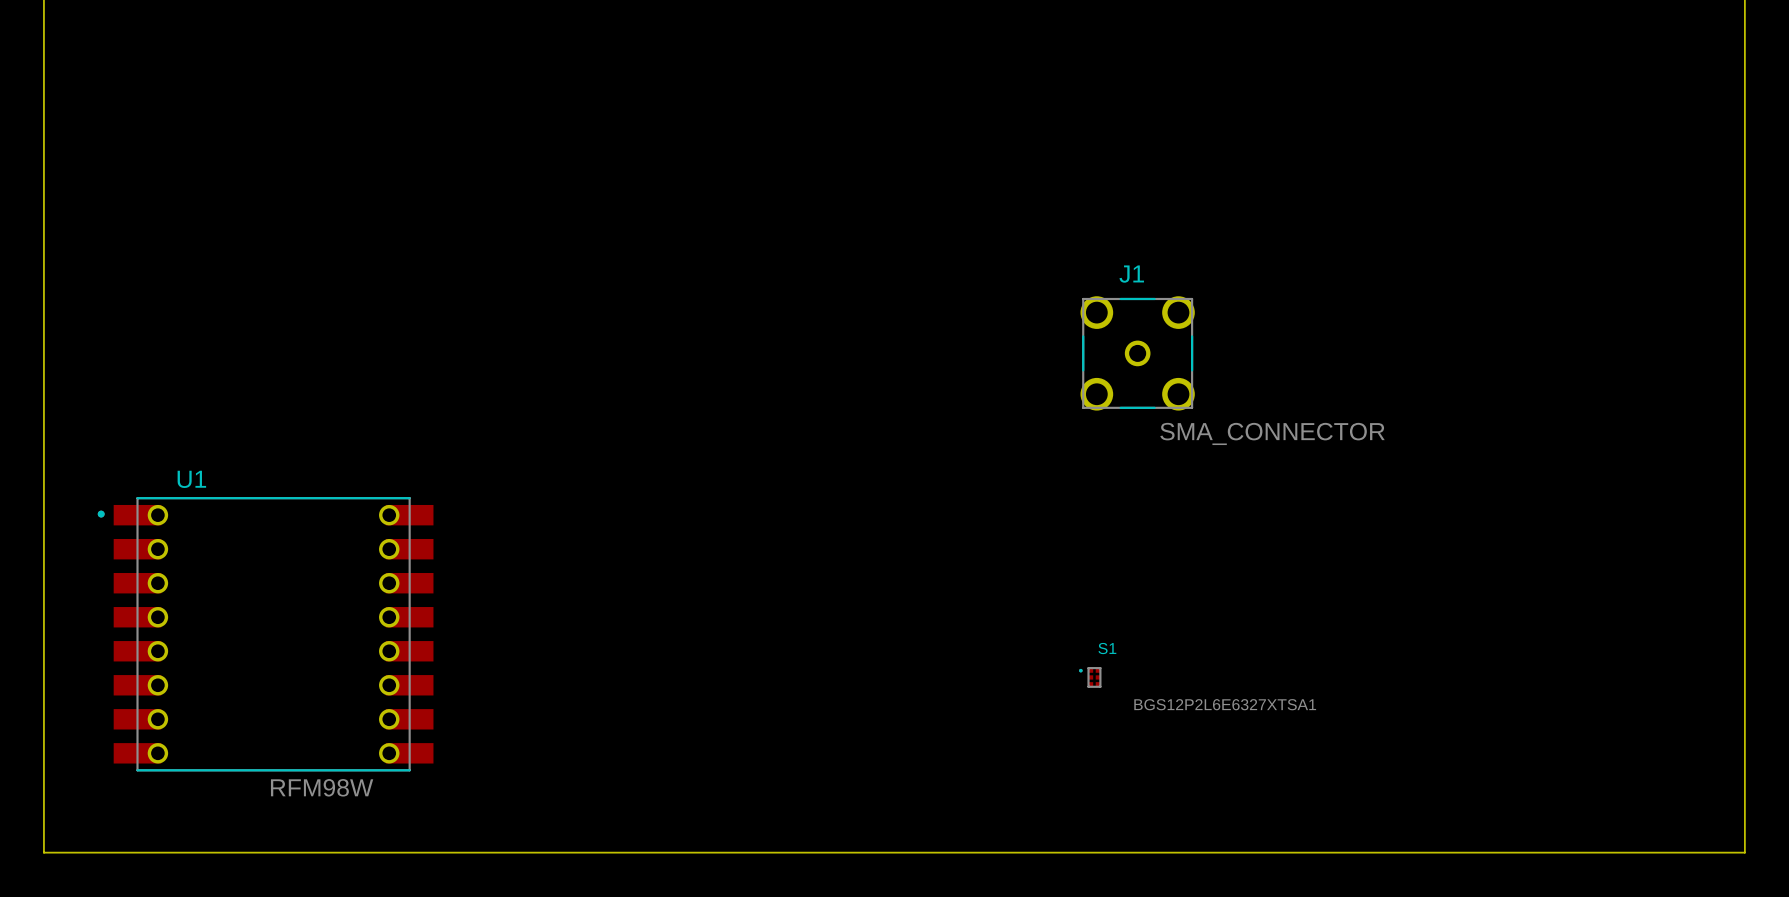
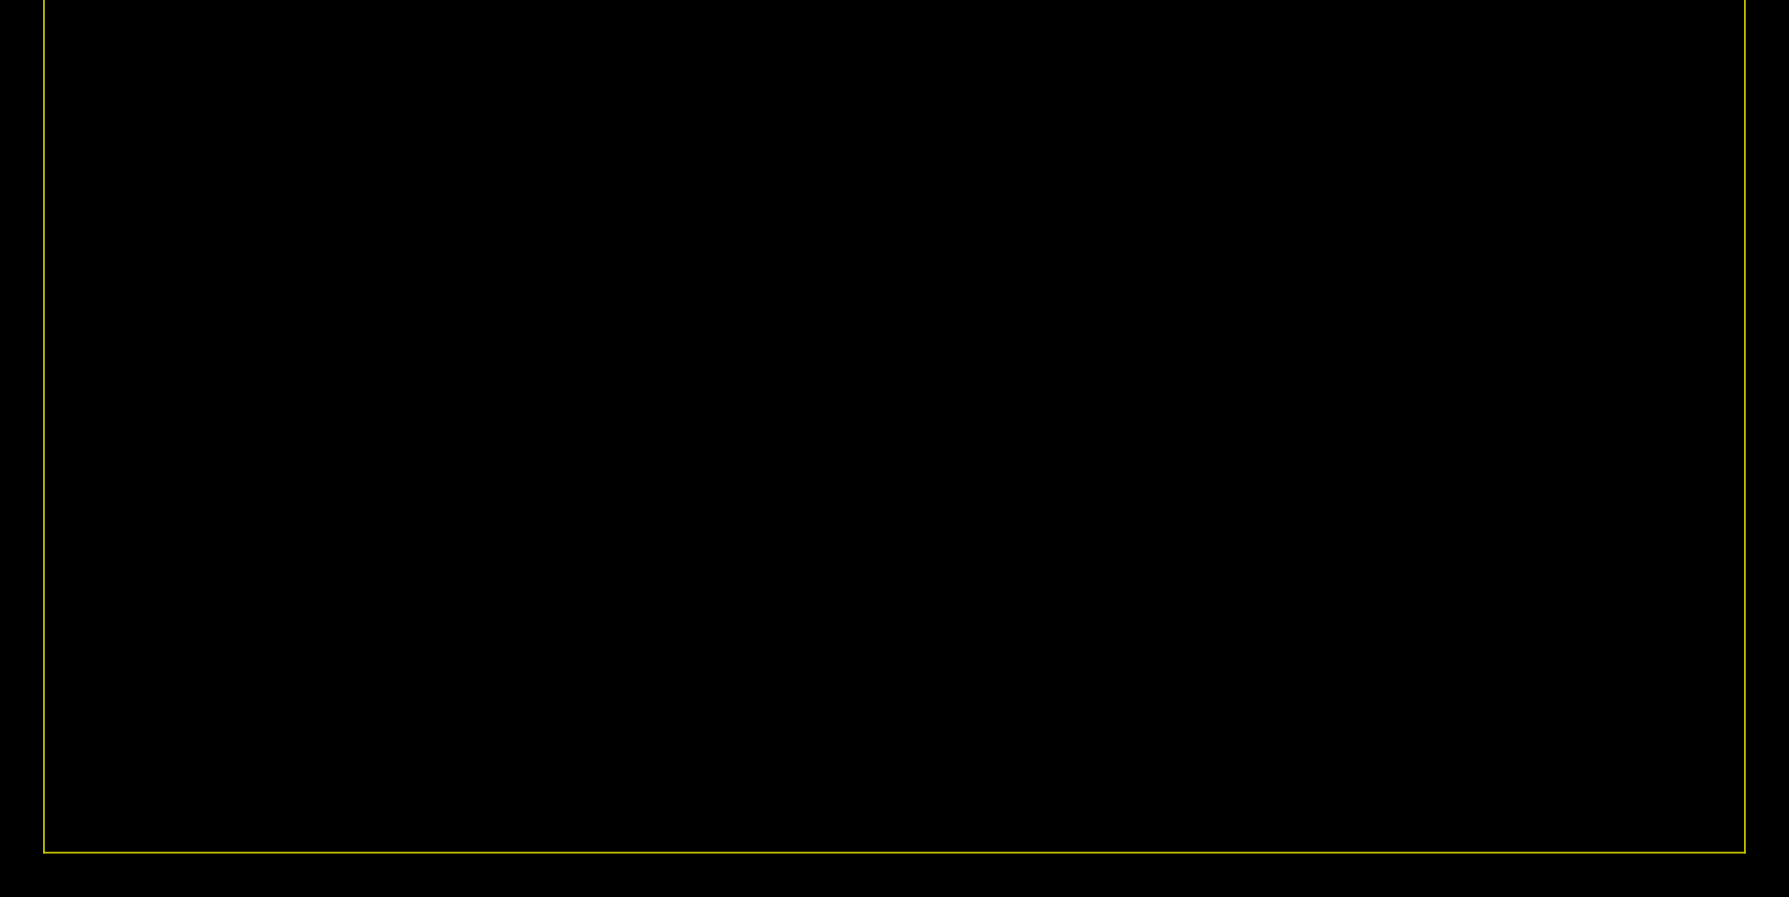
J1: SMA_CONNECTOR (1137, 353) -> none
U1: RFM98W (265, 634) -> none
S1: BGS12P2L6E6327XTSA1 (1090, 677) -> none

